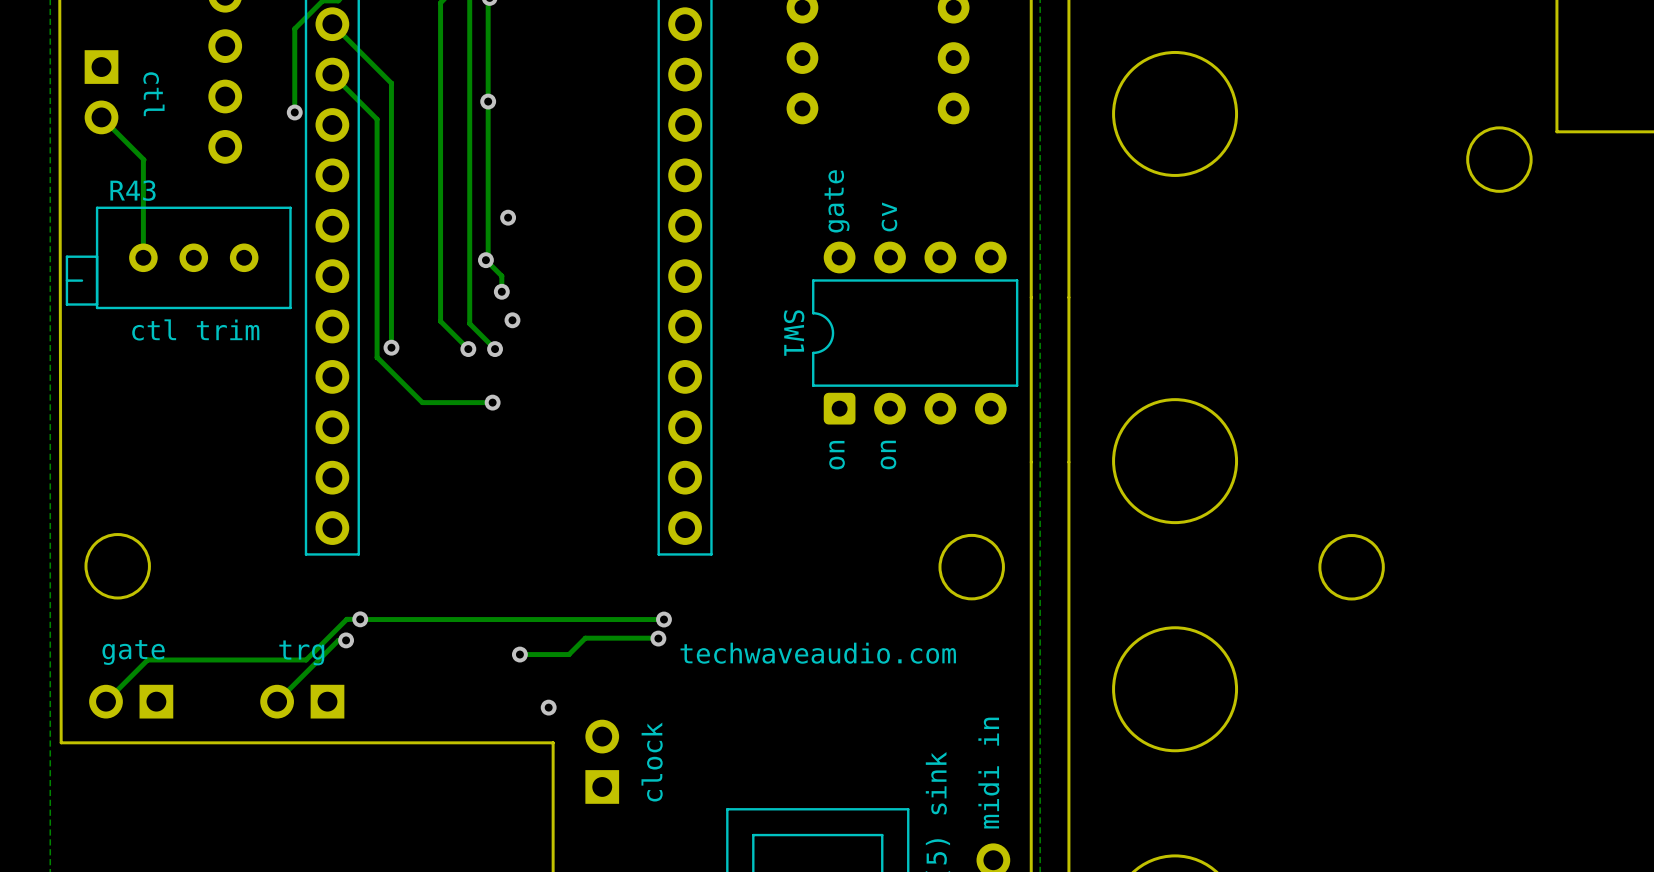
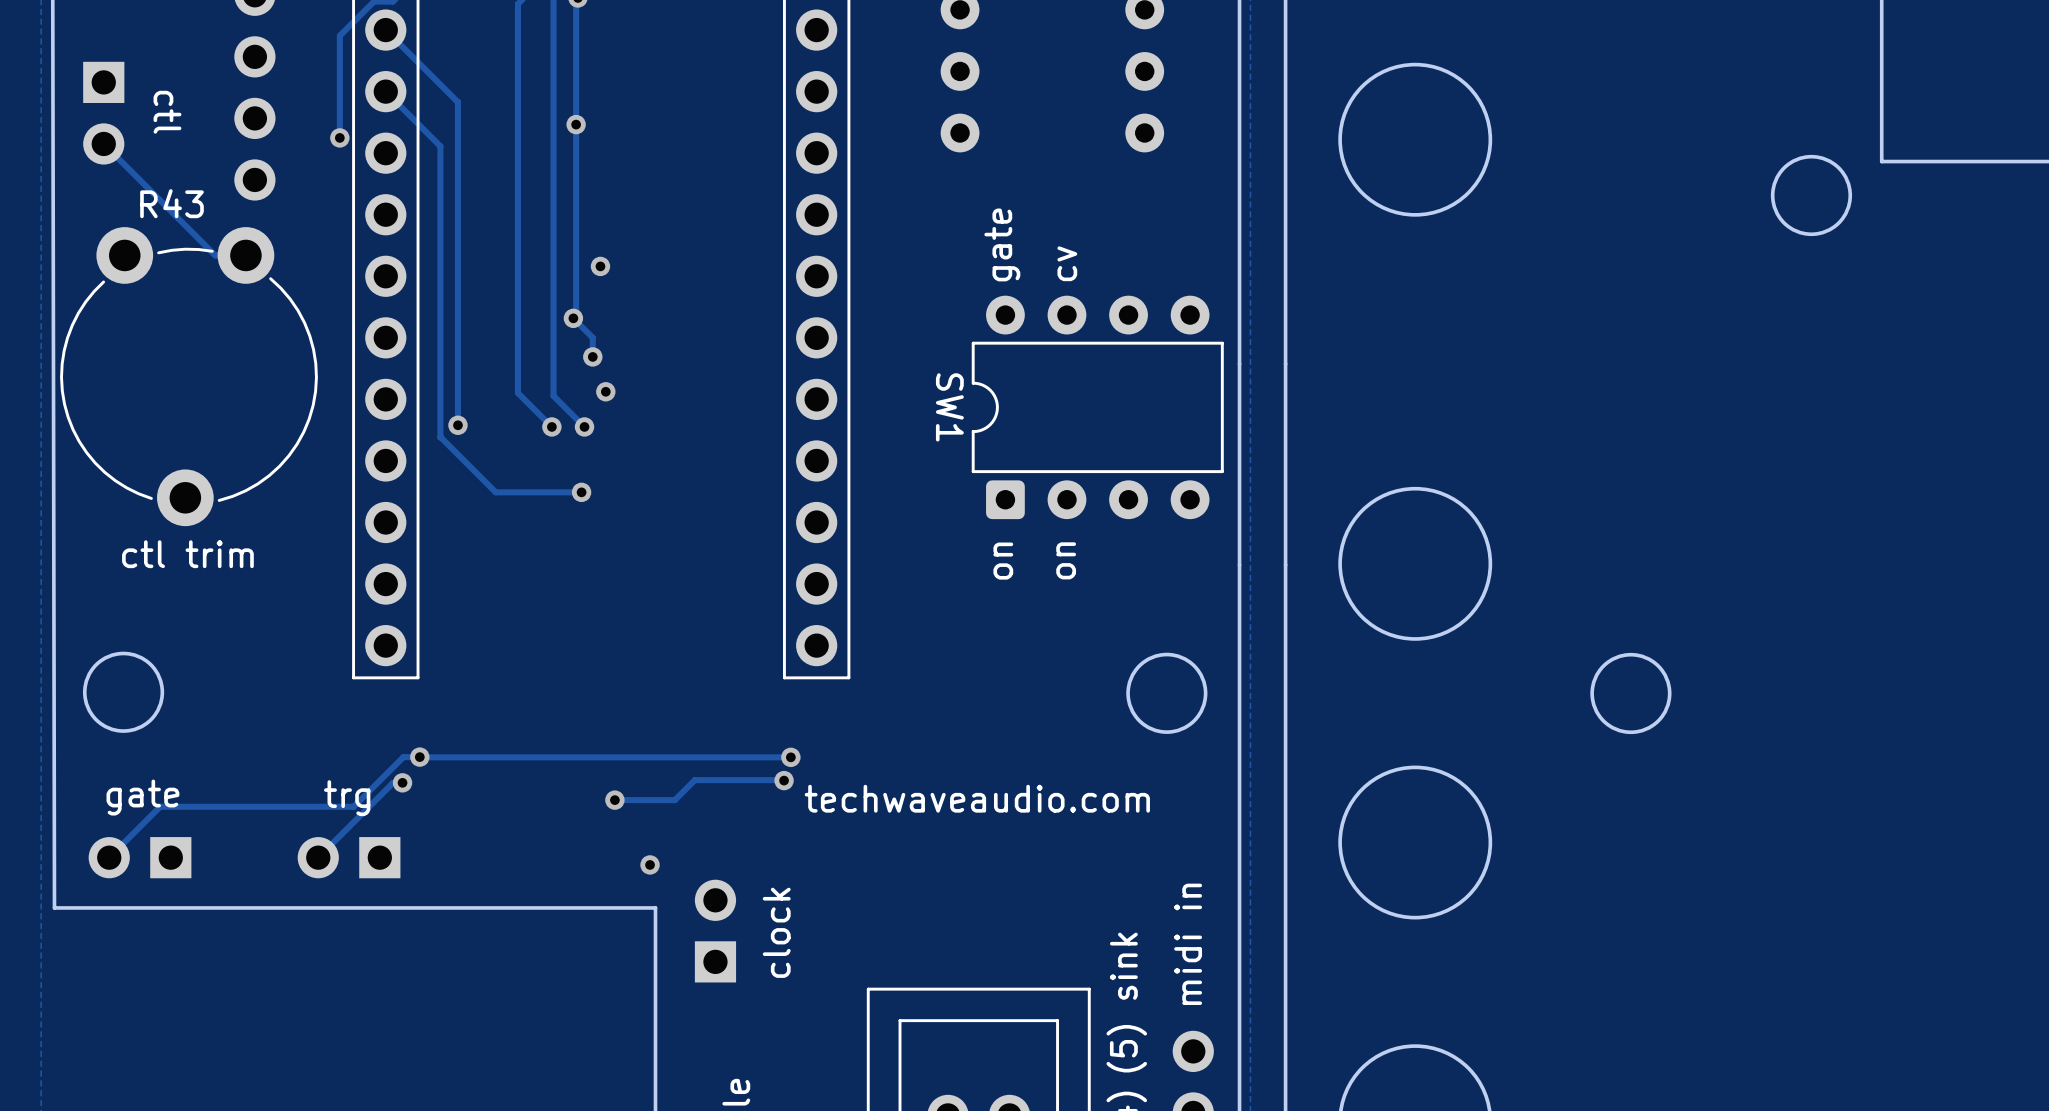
track: (143, 159) (143, 257) -> (155, 195) (215, 255) (245, 255)
R43 name position: R43 (133, 190) -> R43 (171, 203)
R43 footprint: [65, 206, 292, 310] -> [60, 227, 318, 527]
text position: ctl trim (195, 329) -> ctl trim (187, 554)

